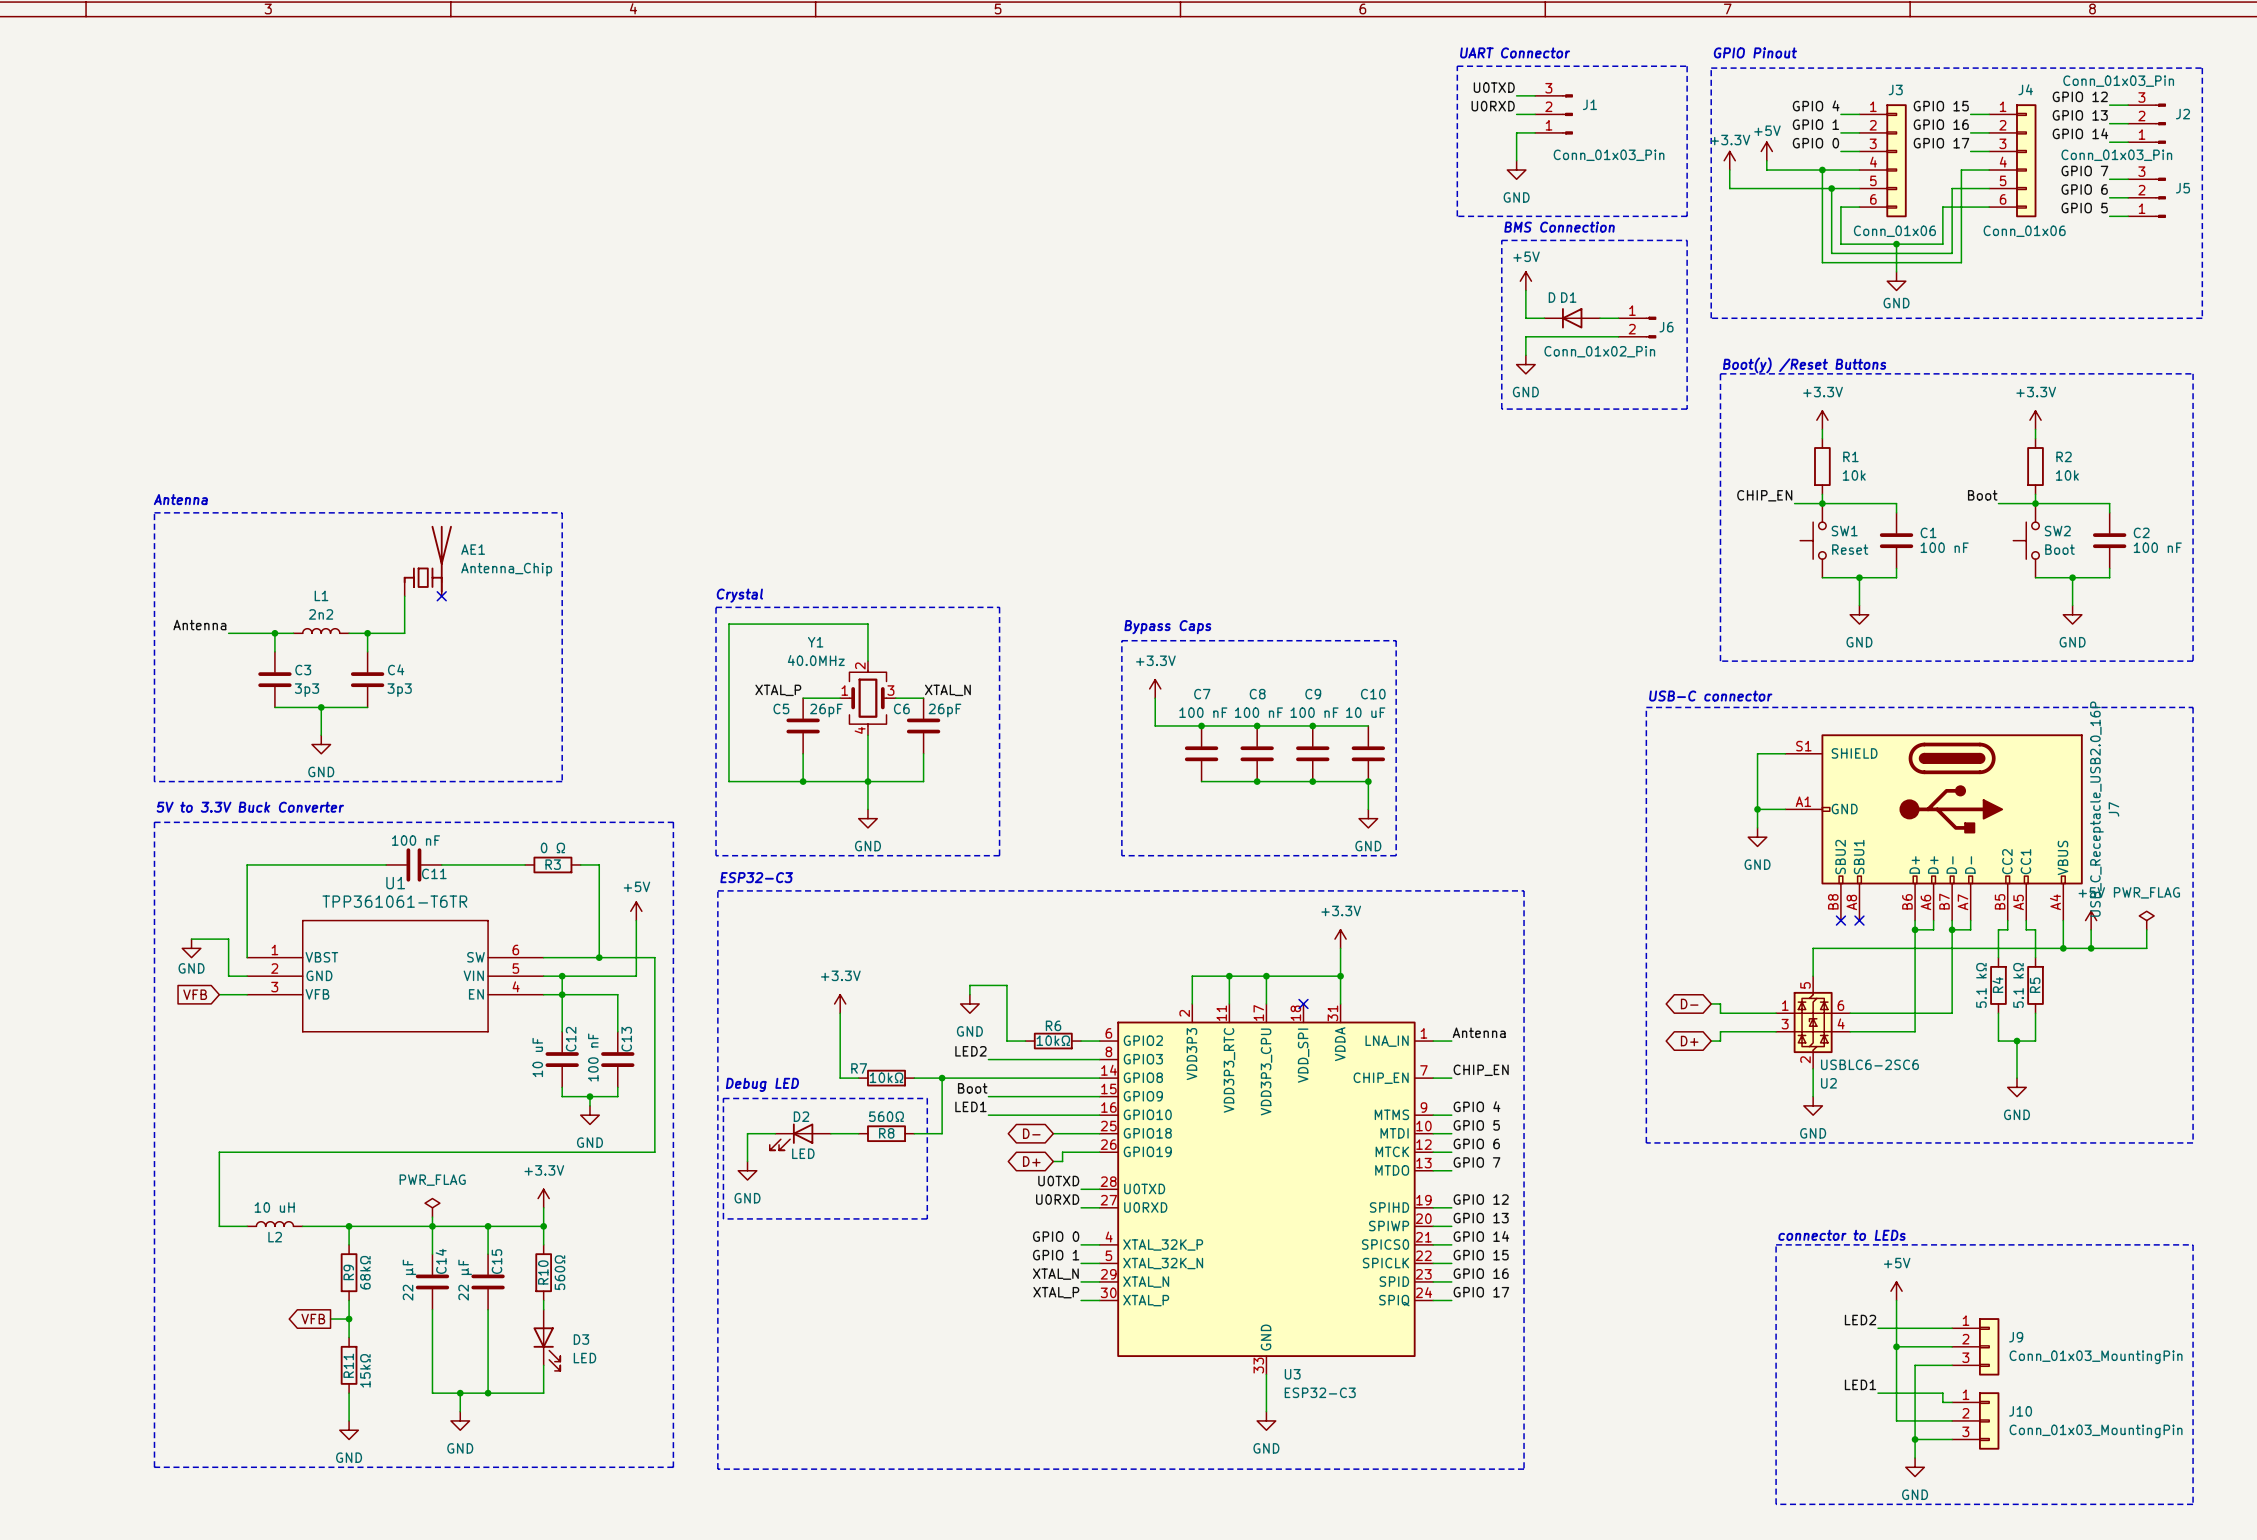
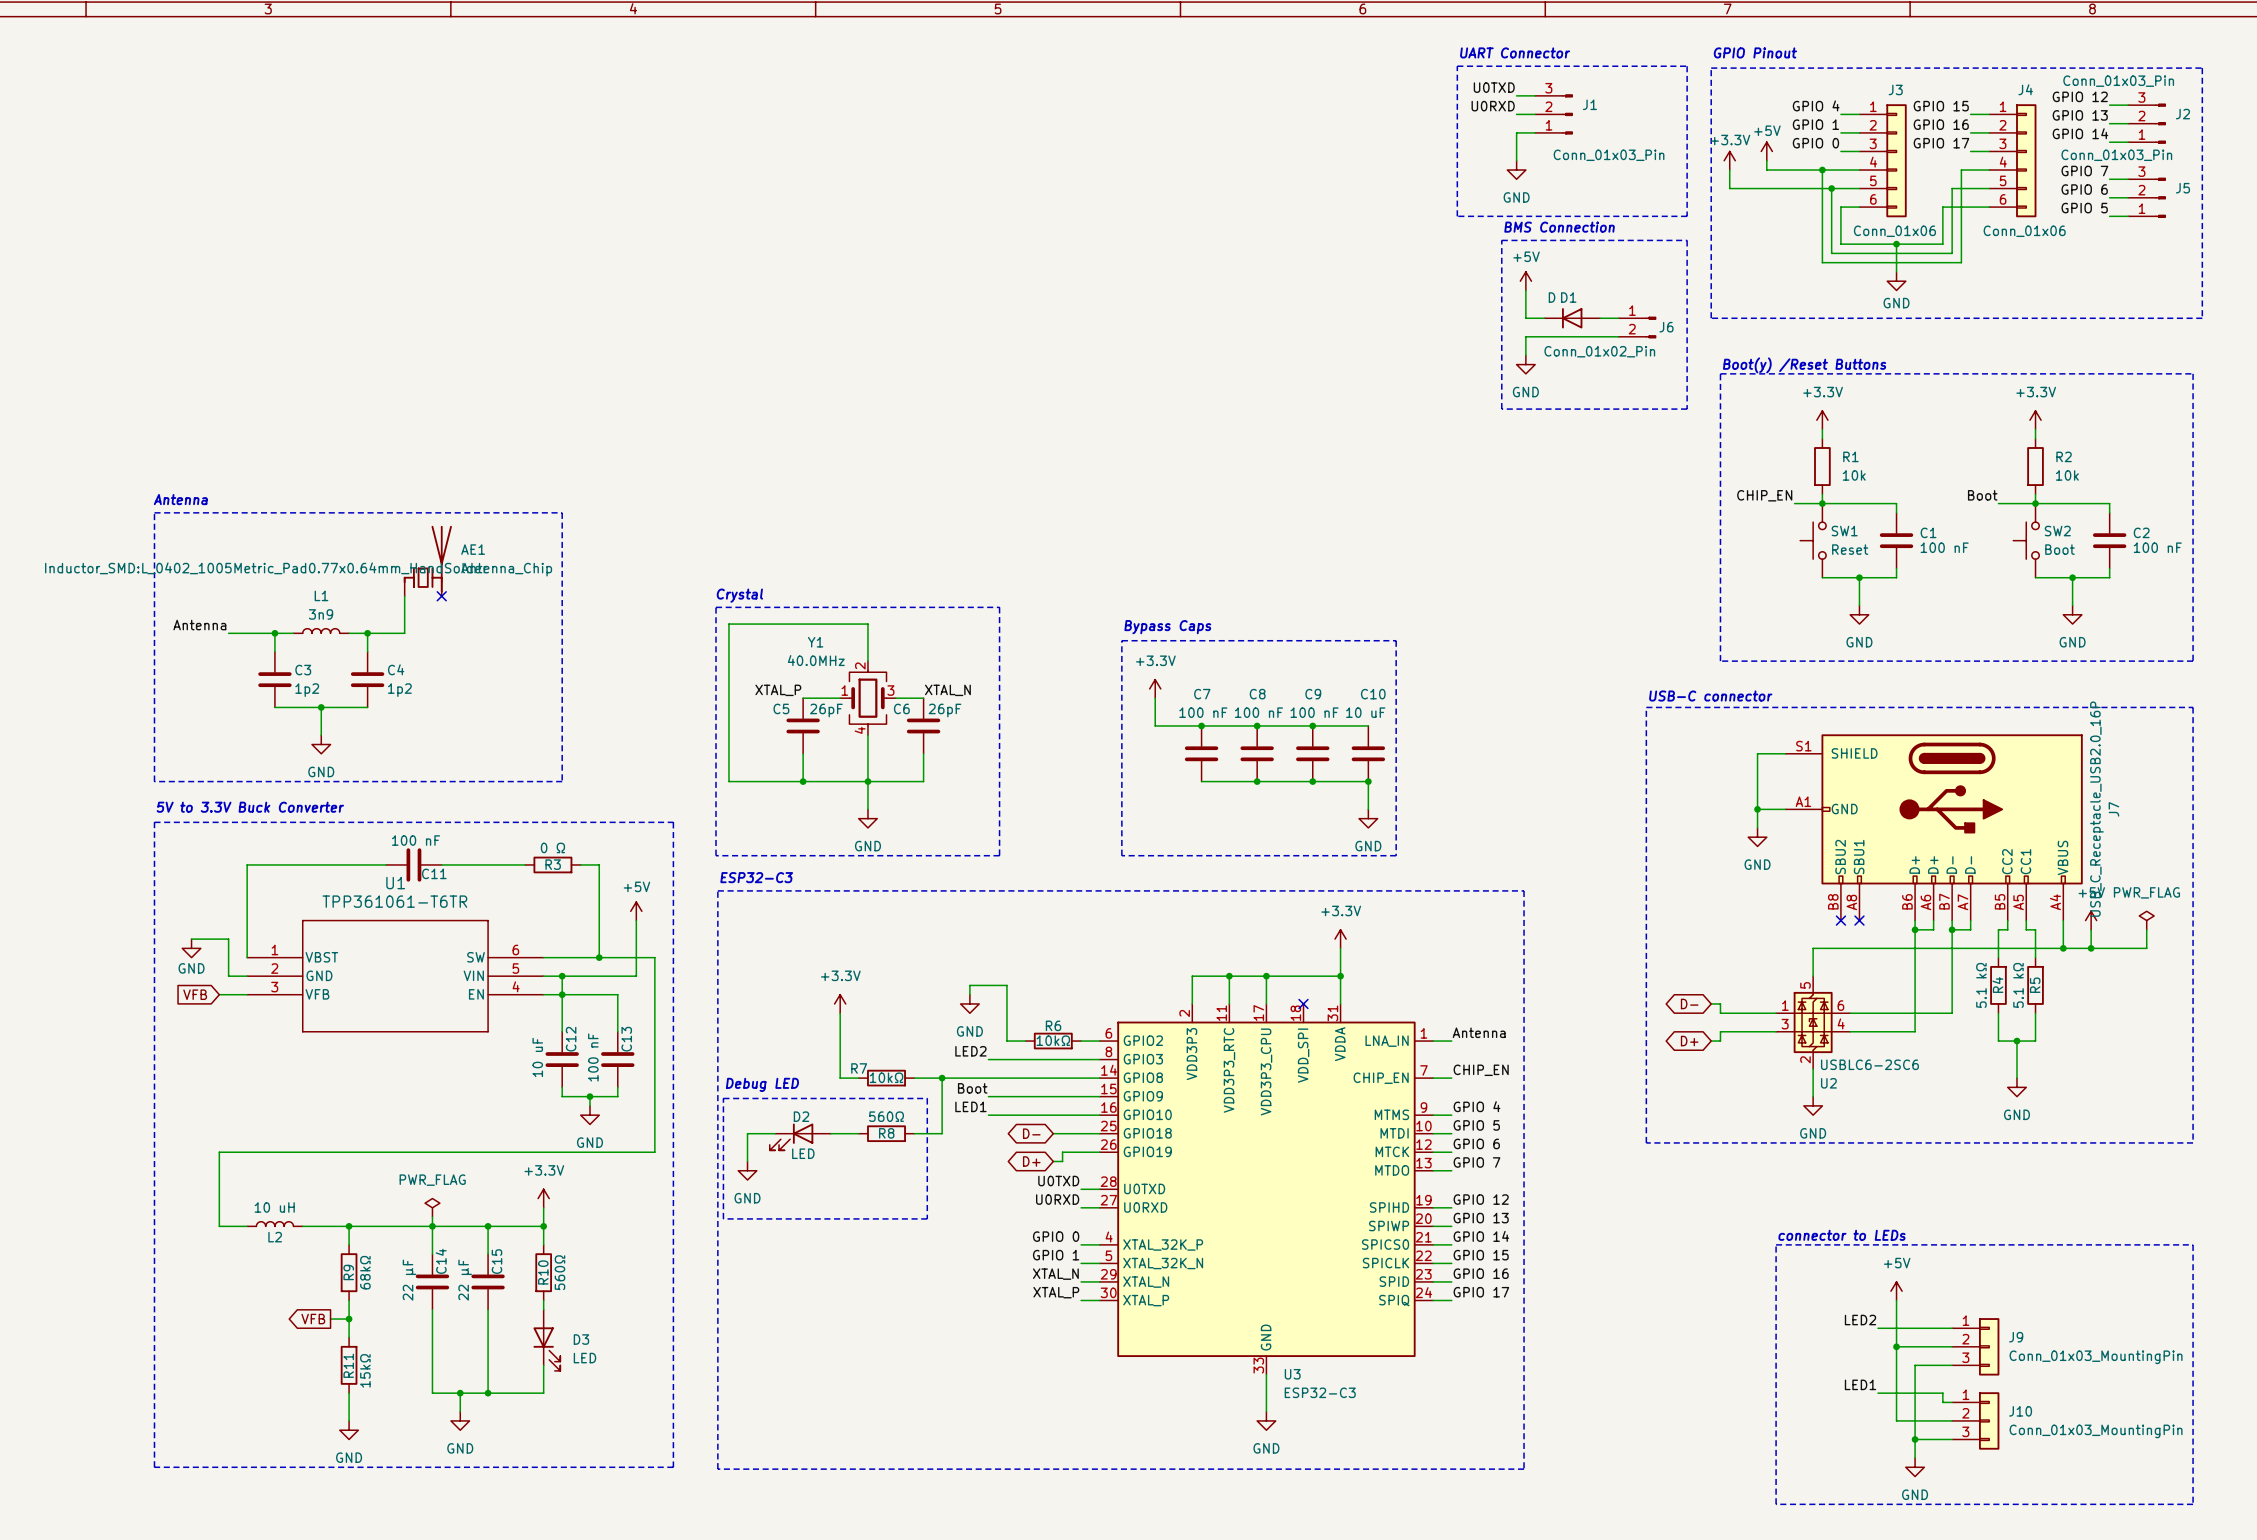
L1 text: none -> Inductor_SMD:L_0402_1005Metric_Pad0.77x0.64mm_HandSolder (266, 568)
L1 value: 2n2 (321, 614) -> 3n9 (321, 614)
C3 value: 3p3 (307, 690) -> 1p2 (307, 690)
C4 value: 3p3 (399, 690) -> 1p2 (399, 690)

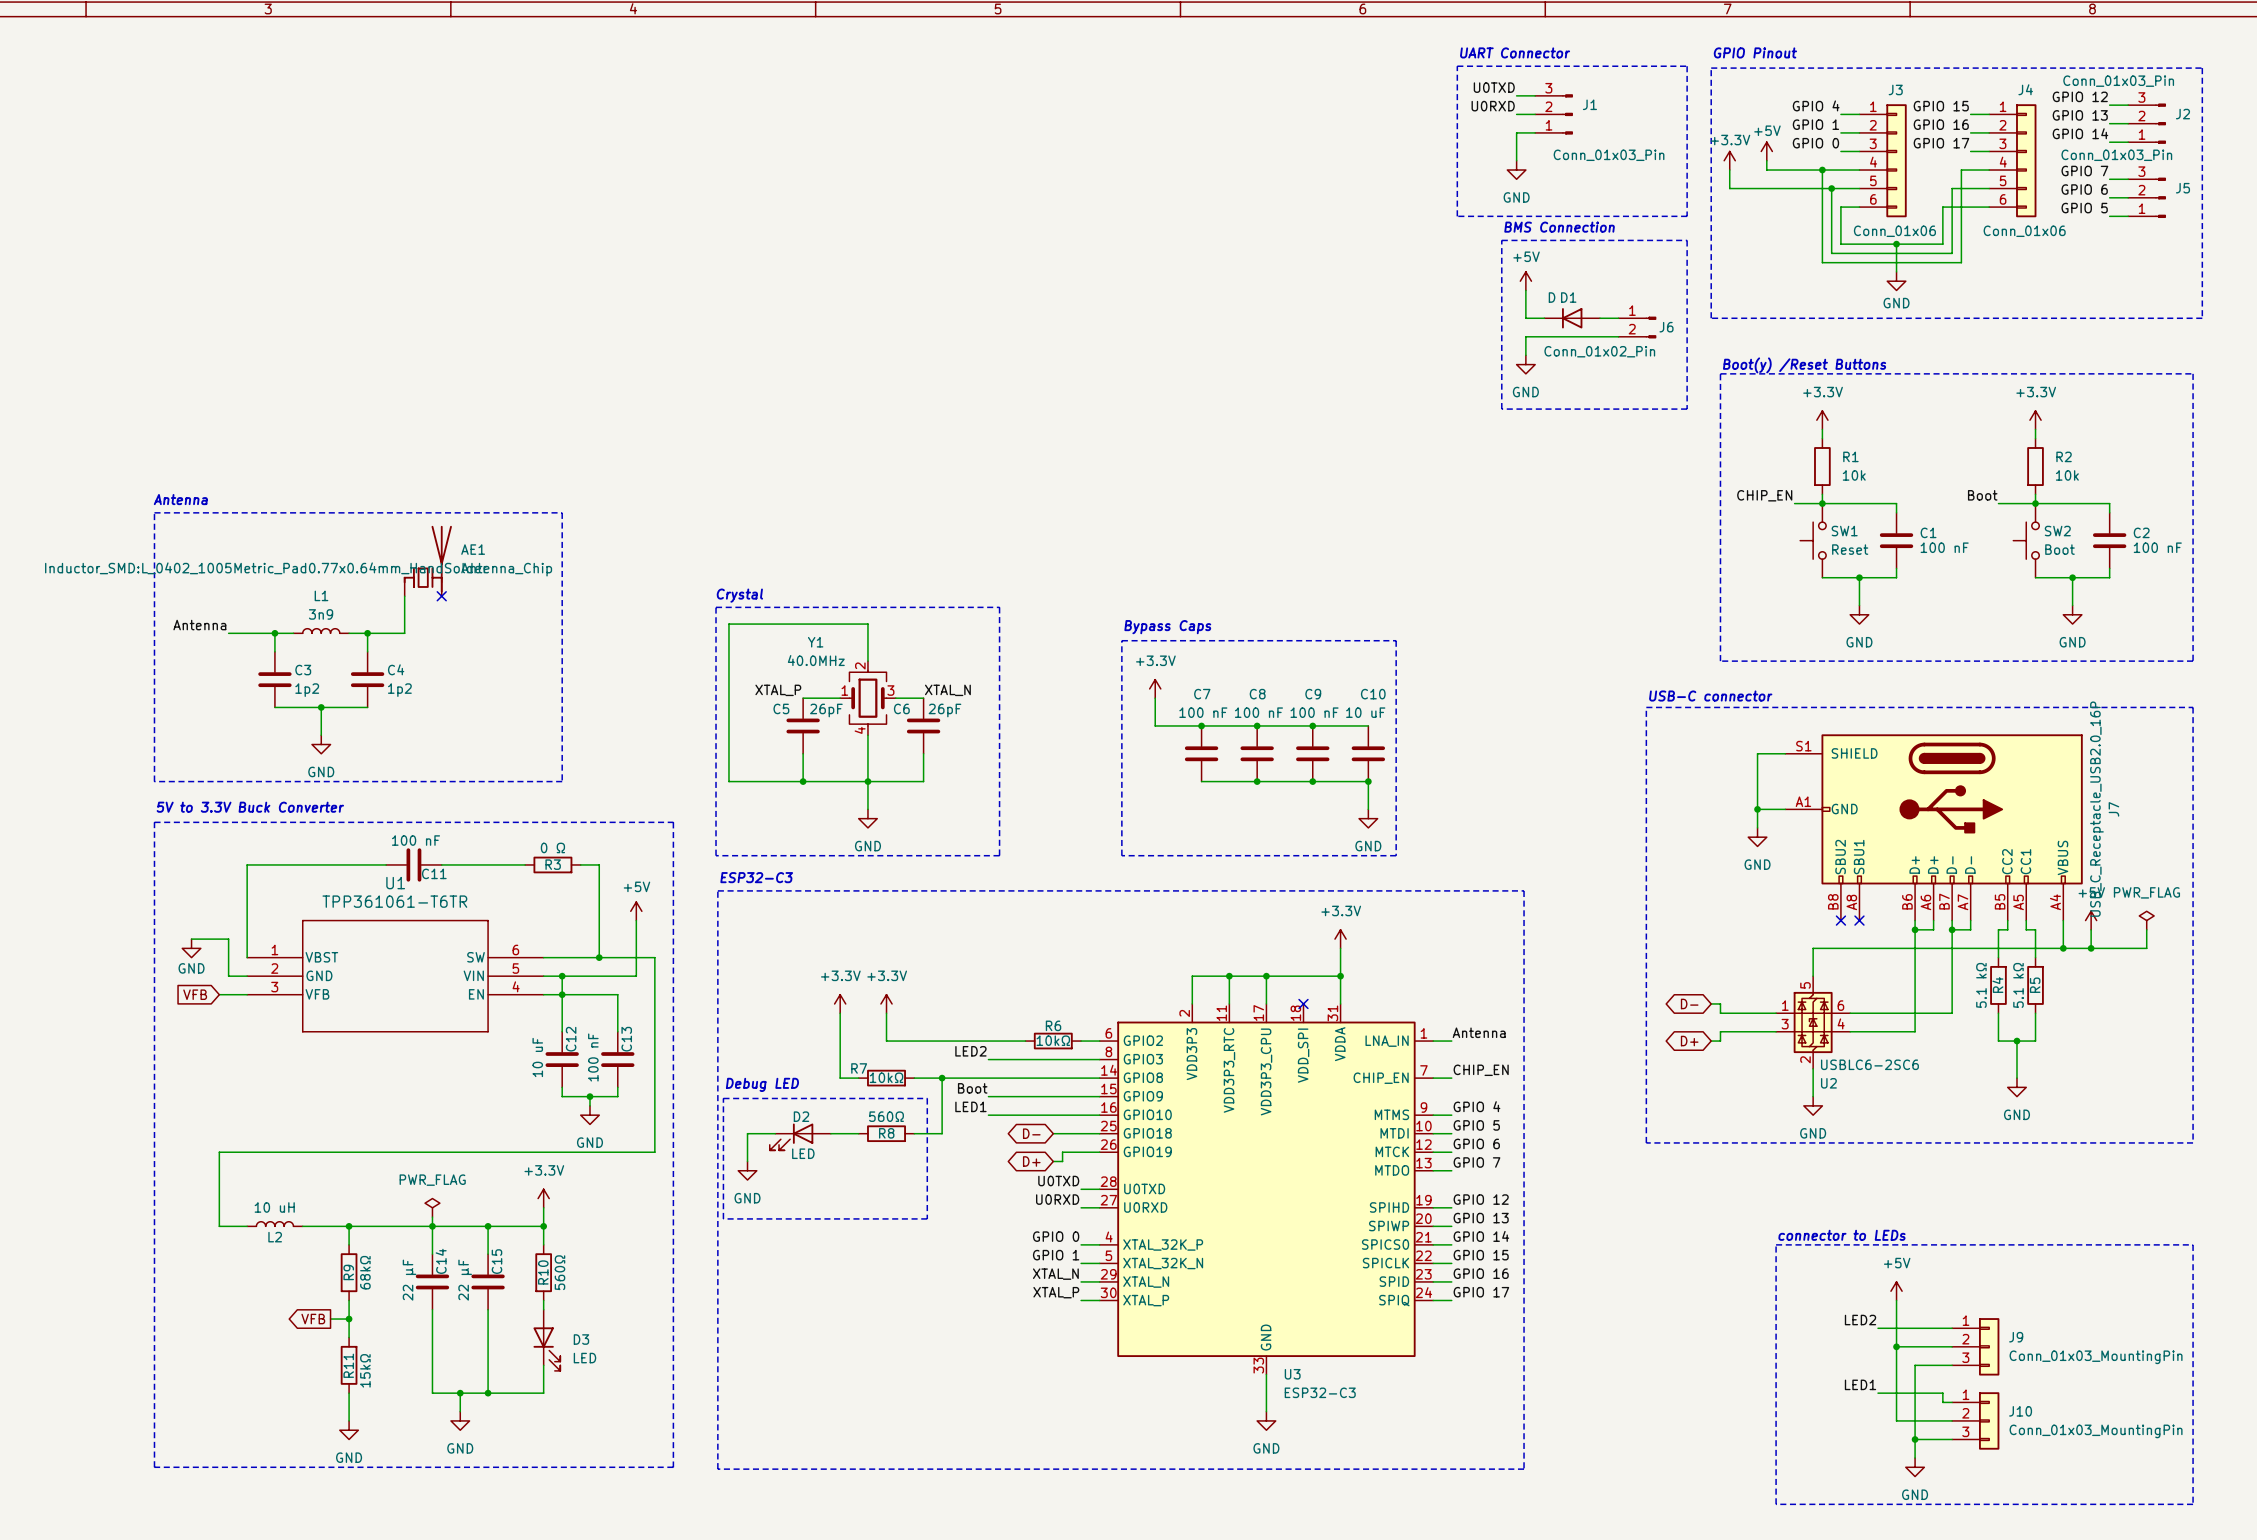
wire: (969, 994) (969, 985) (1006, 985) (1006, 1041) -> (886, 1013) (886, 1041) (1006, 1041)
power symbol: none -> +3.3V (886, 1003)
power symbol: GND (969, 1003) -> none

